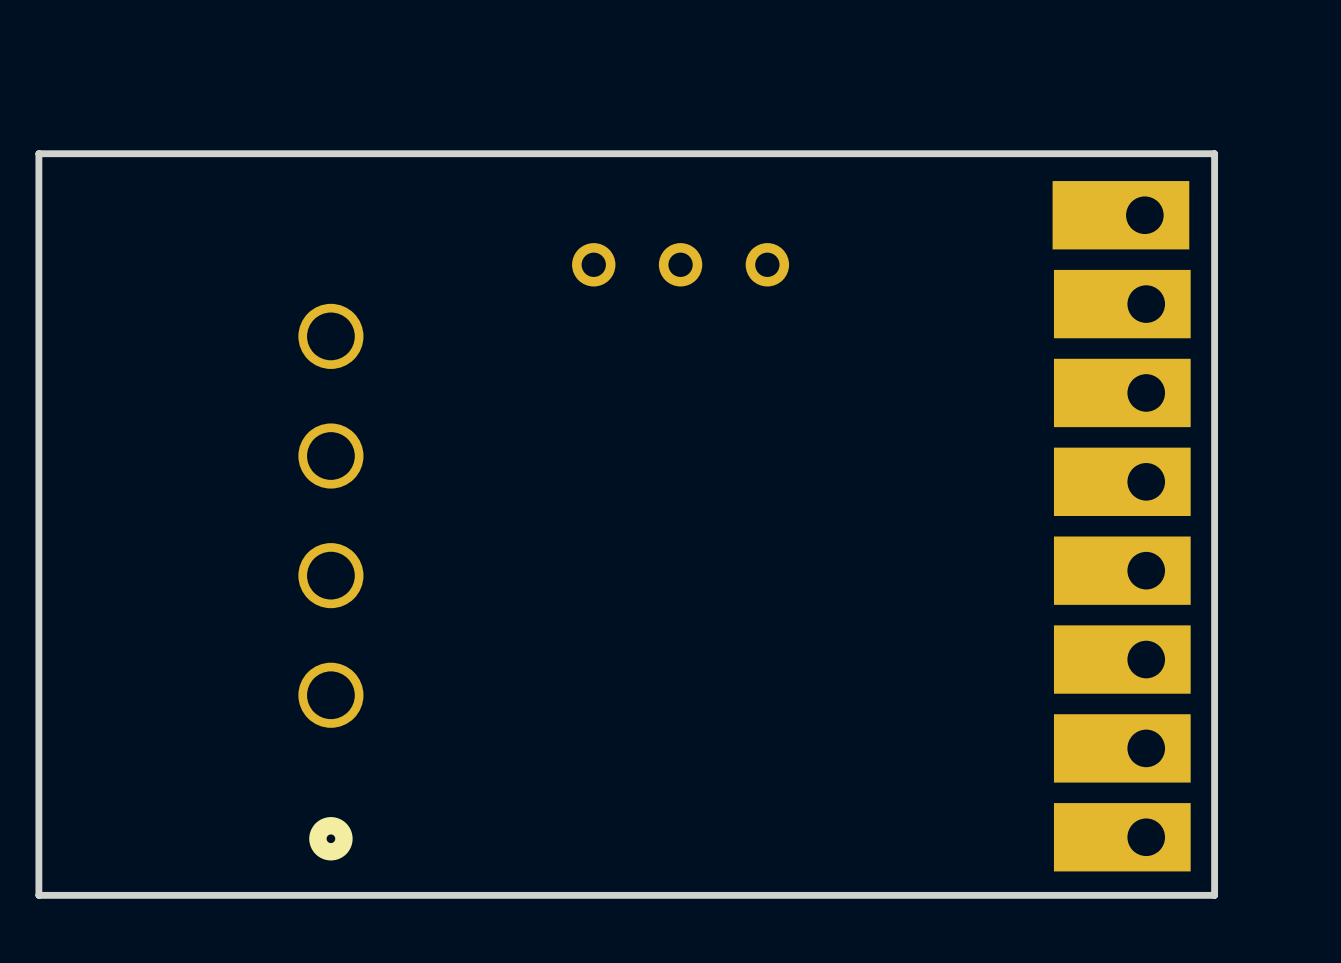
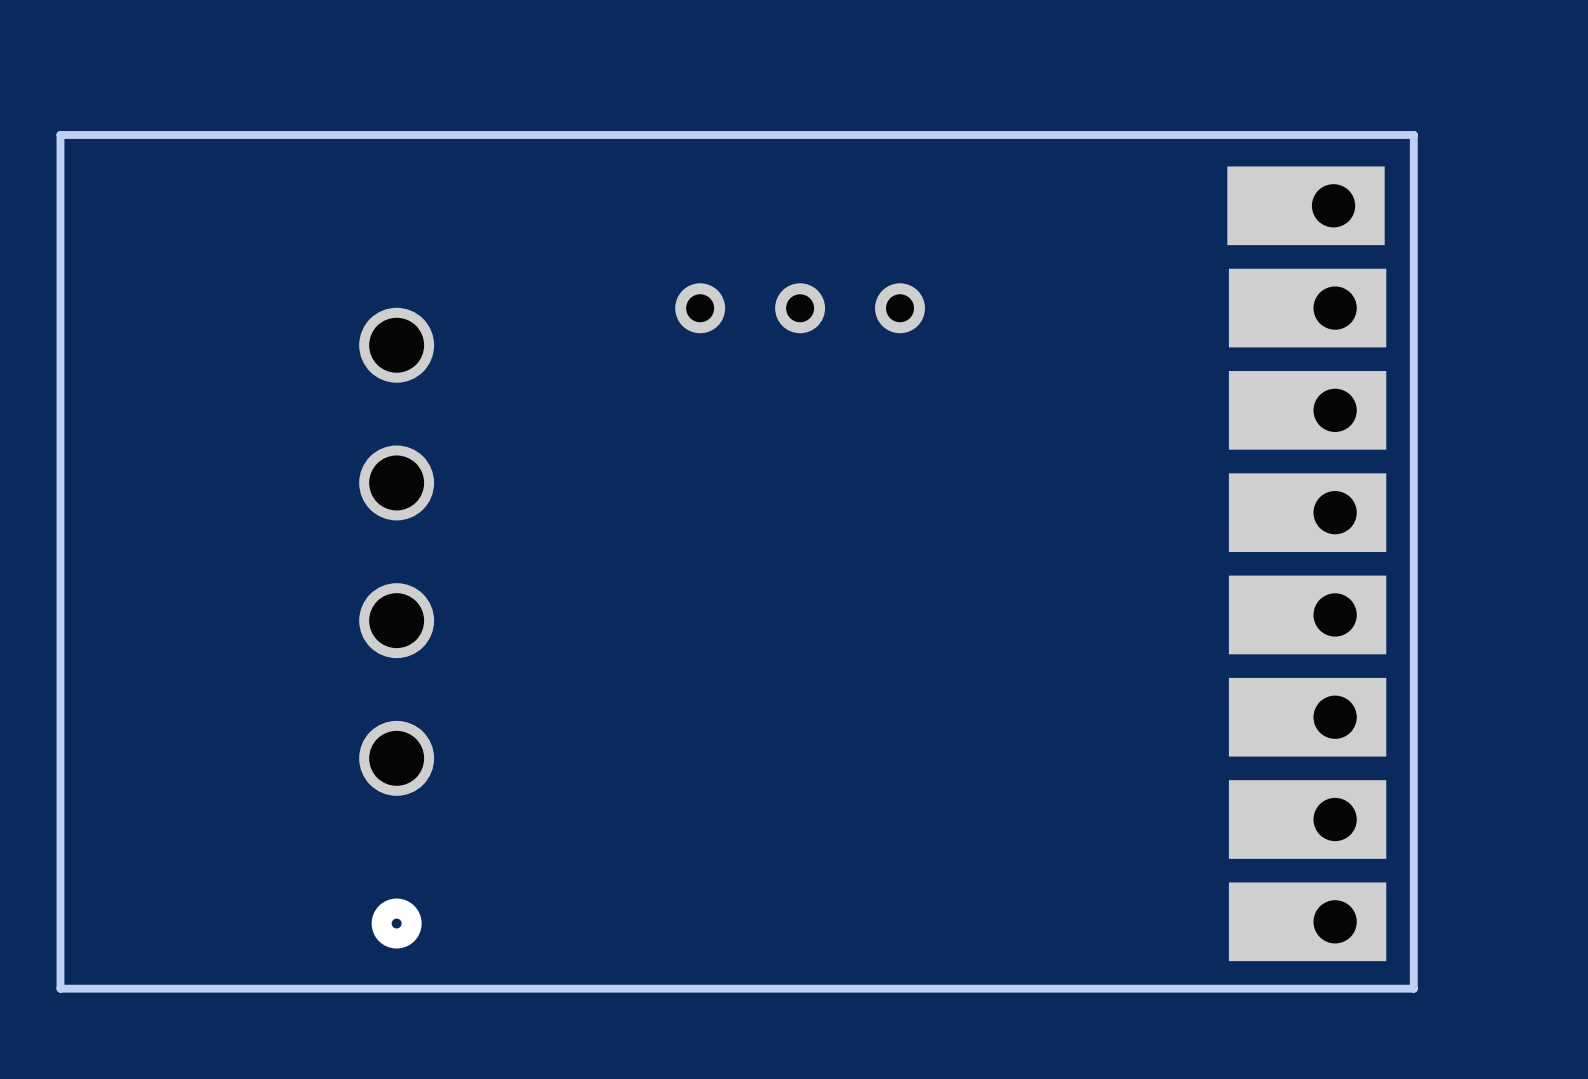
part position: (680, 264) -> (800, 308)

